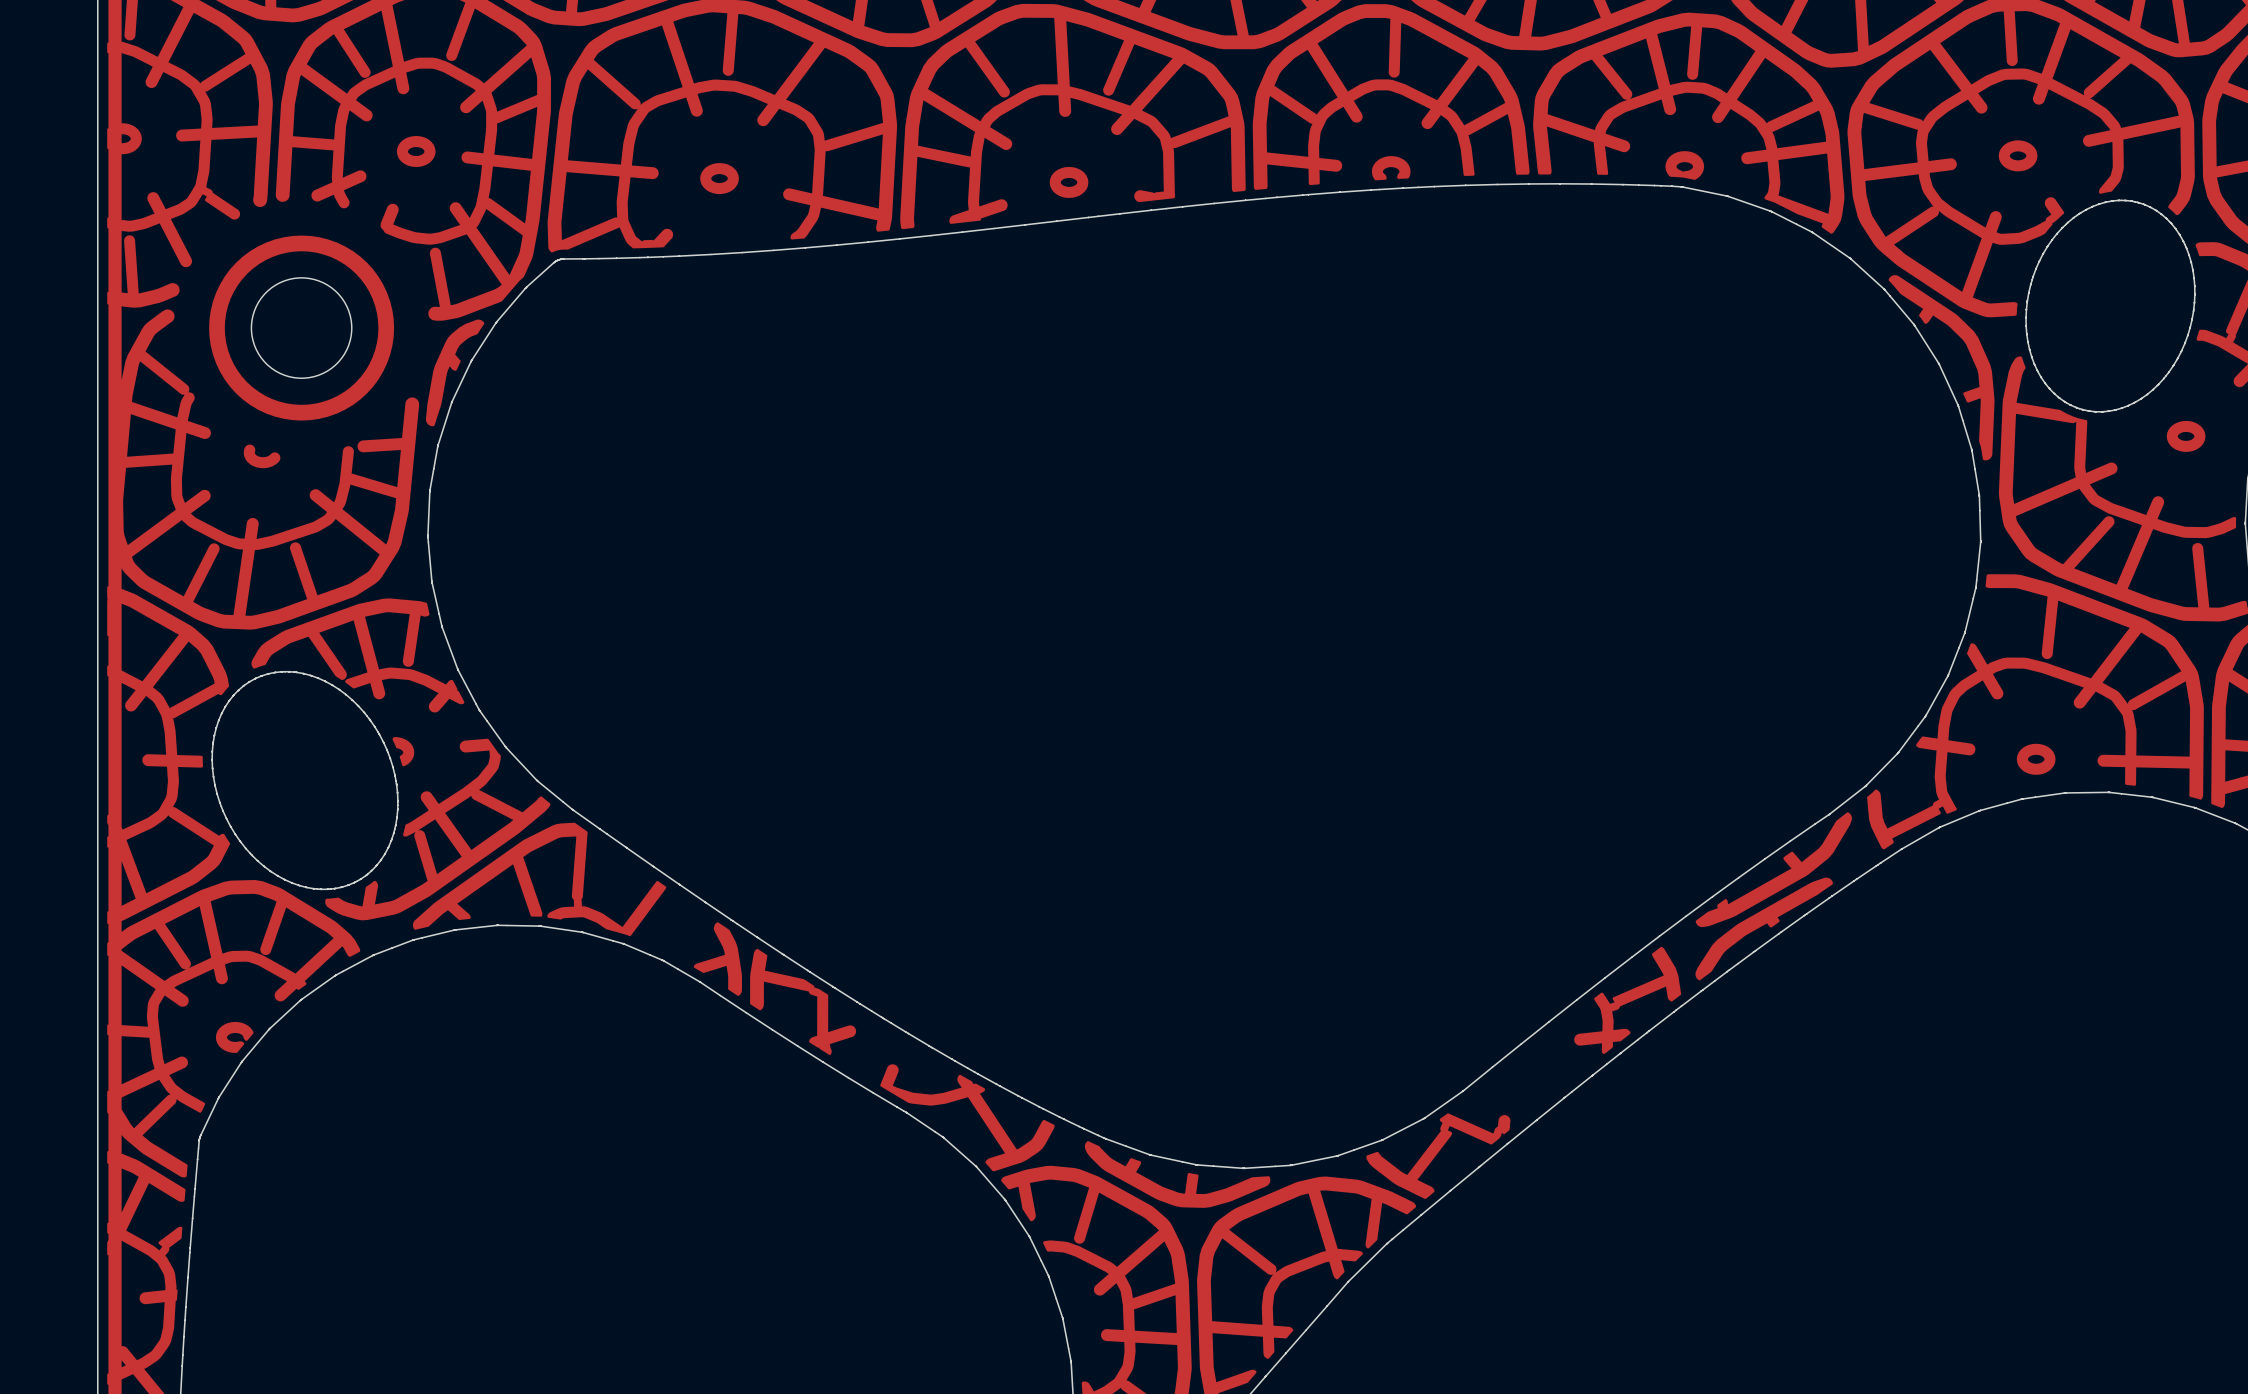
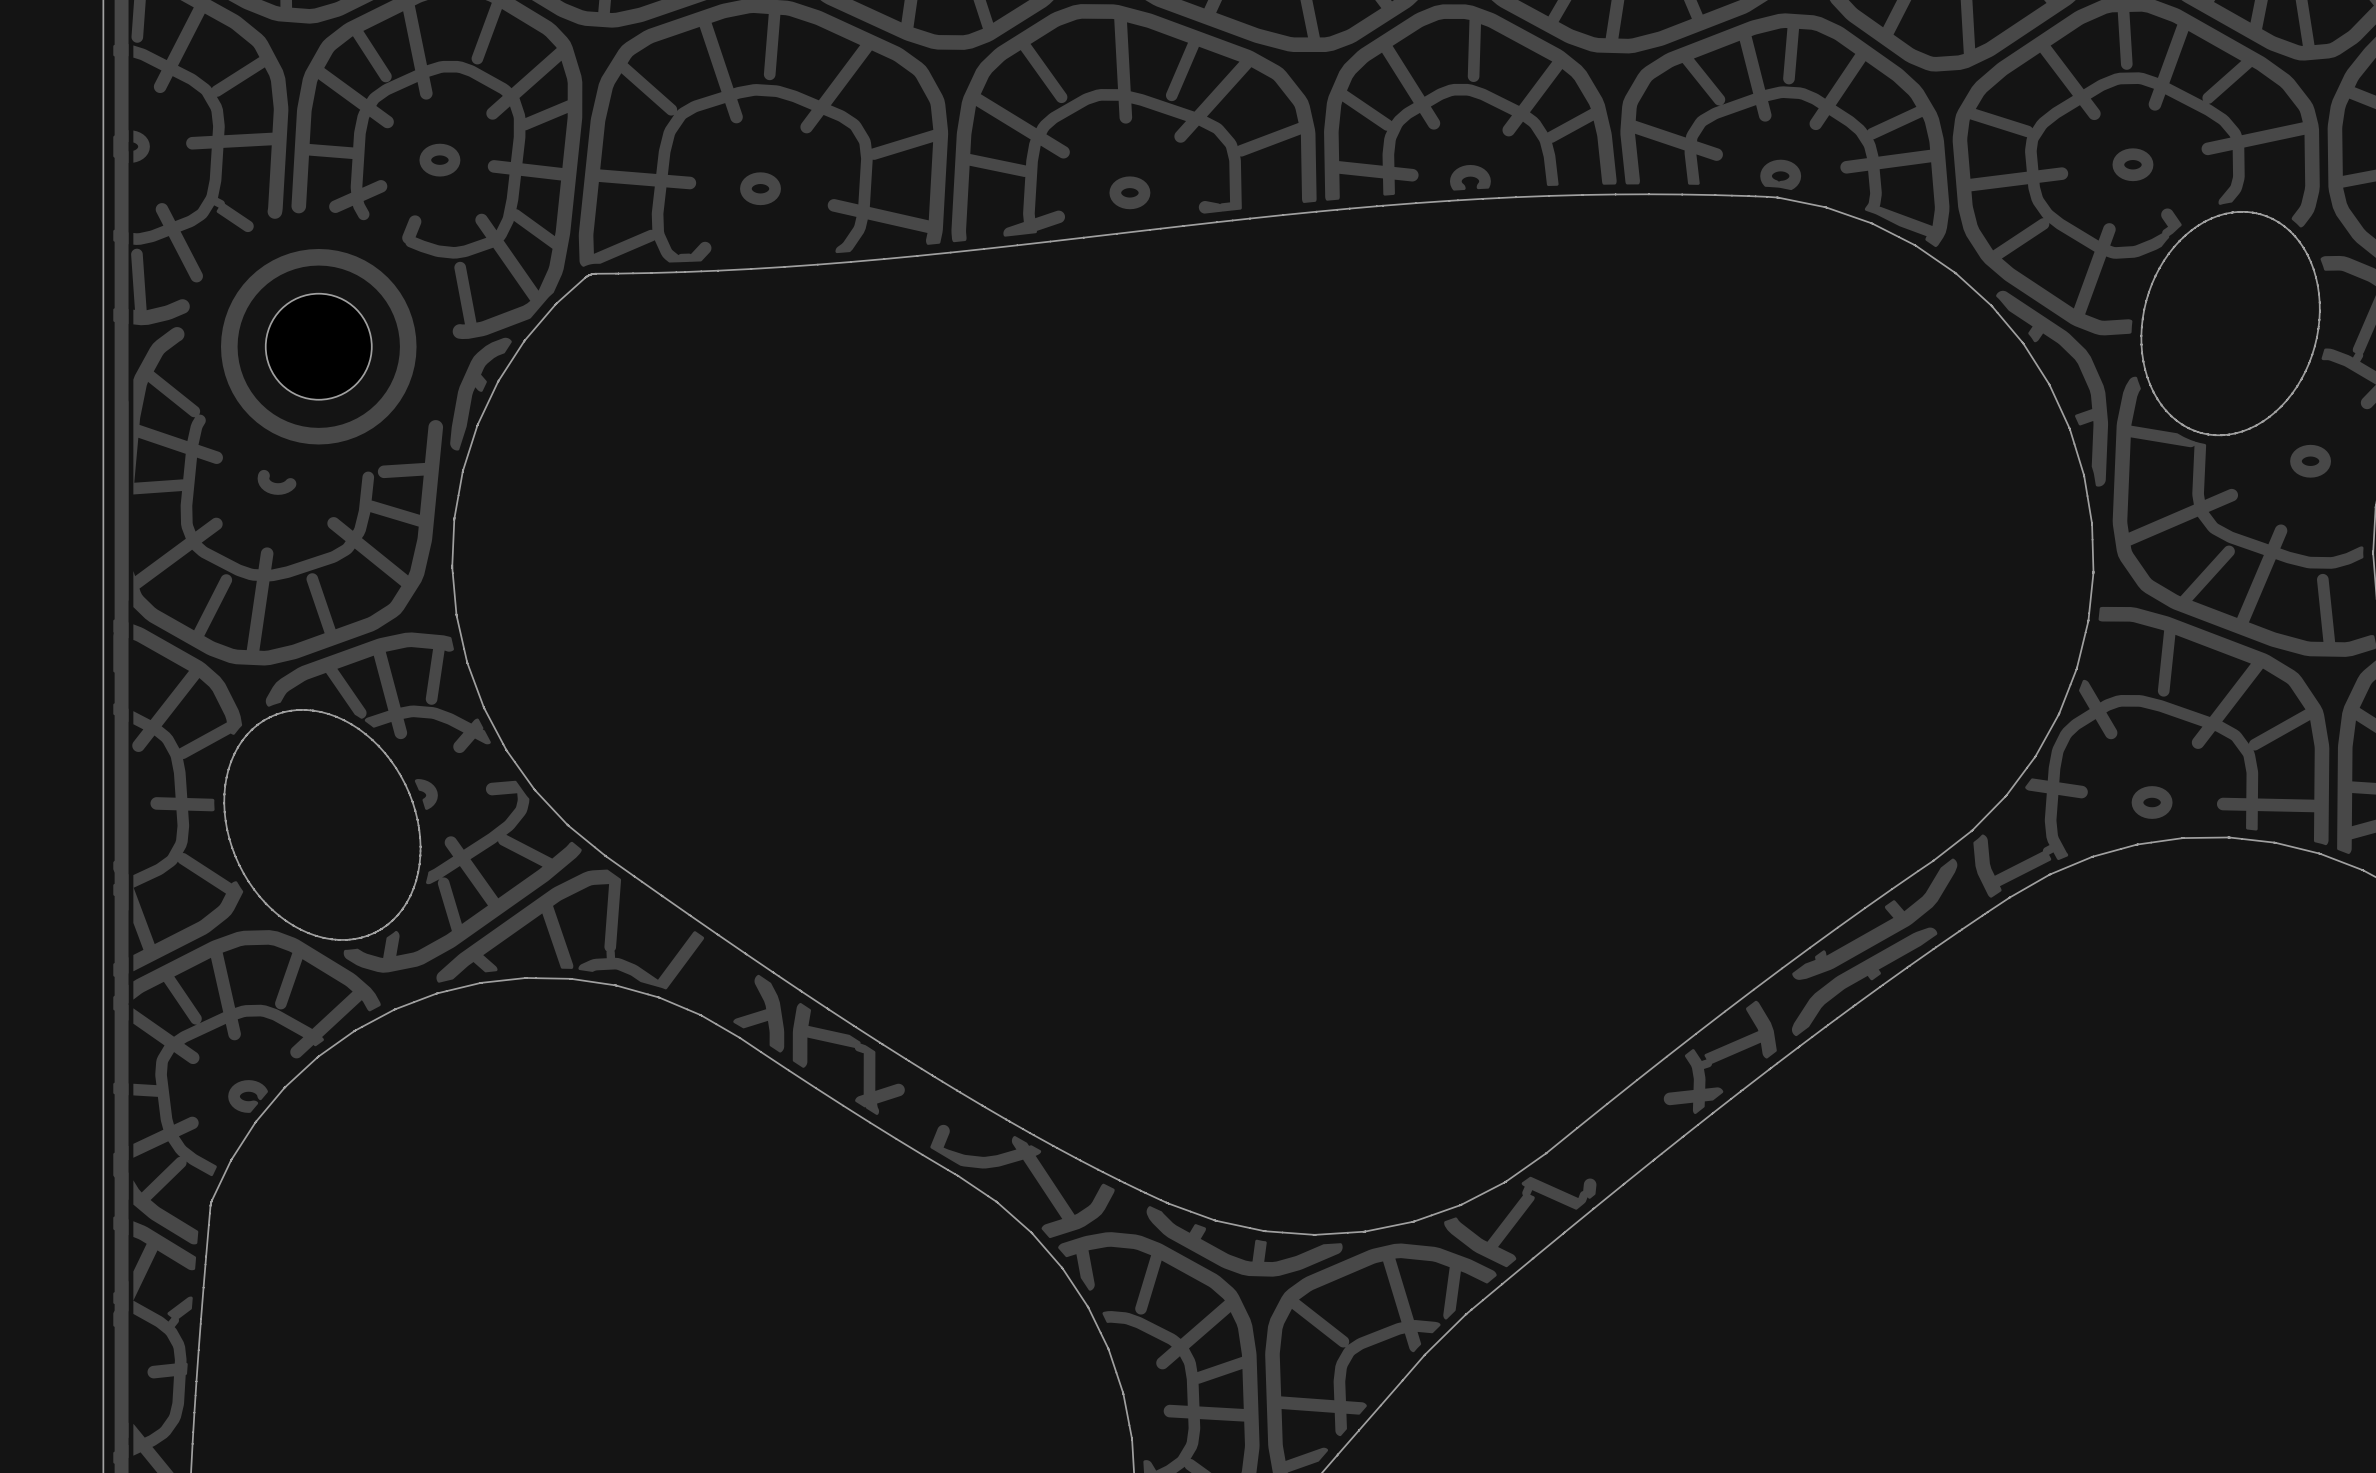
drawing: [121, 41, 127, 55] -> none
drawing: [121, 123, 127, 155] -> none
drawing: [121, 219, 127, 232] -> none
drawing: [121, 292, 127, 307] -> none
drawing: [121, 359, 127, 606] -> none
drawing: [121, 670, 127, 686] -> none
drawing: [121, 827, 127, 969] -> none
drawing: [121, 1025, 127, 1037] -> none
drawing: [121, 1082, 127, 1244] -> none
drawing: [121, 1346, 127, 1380] -> none

